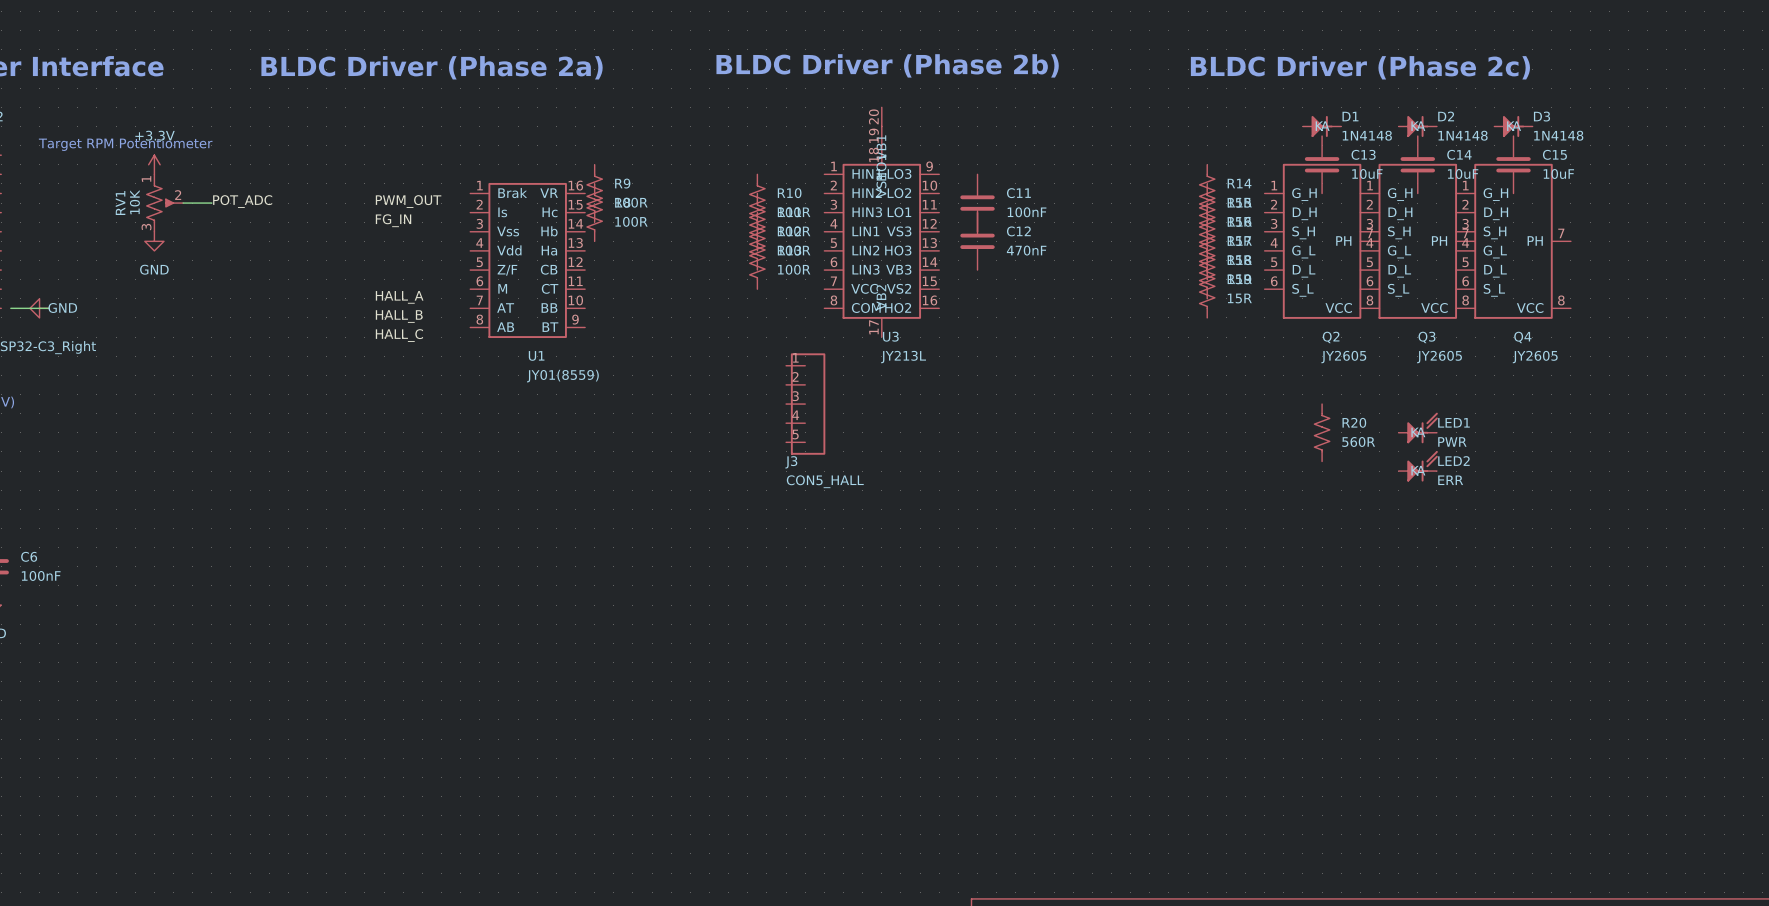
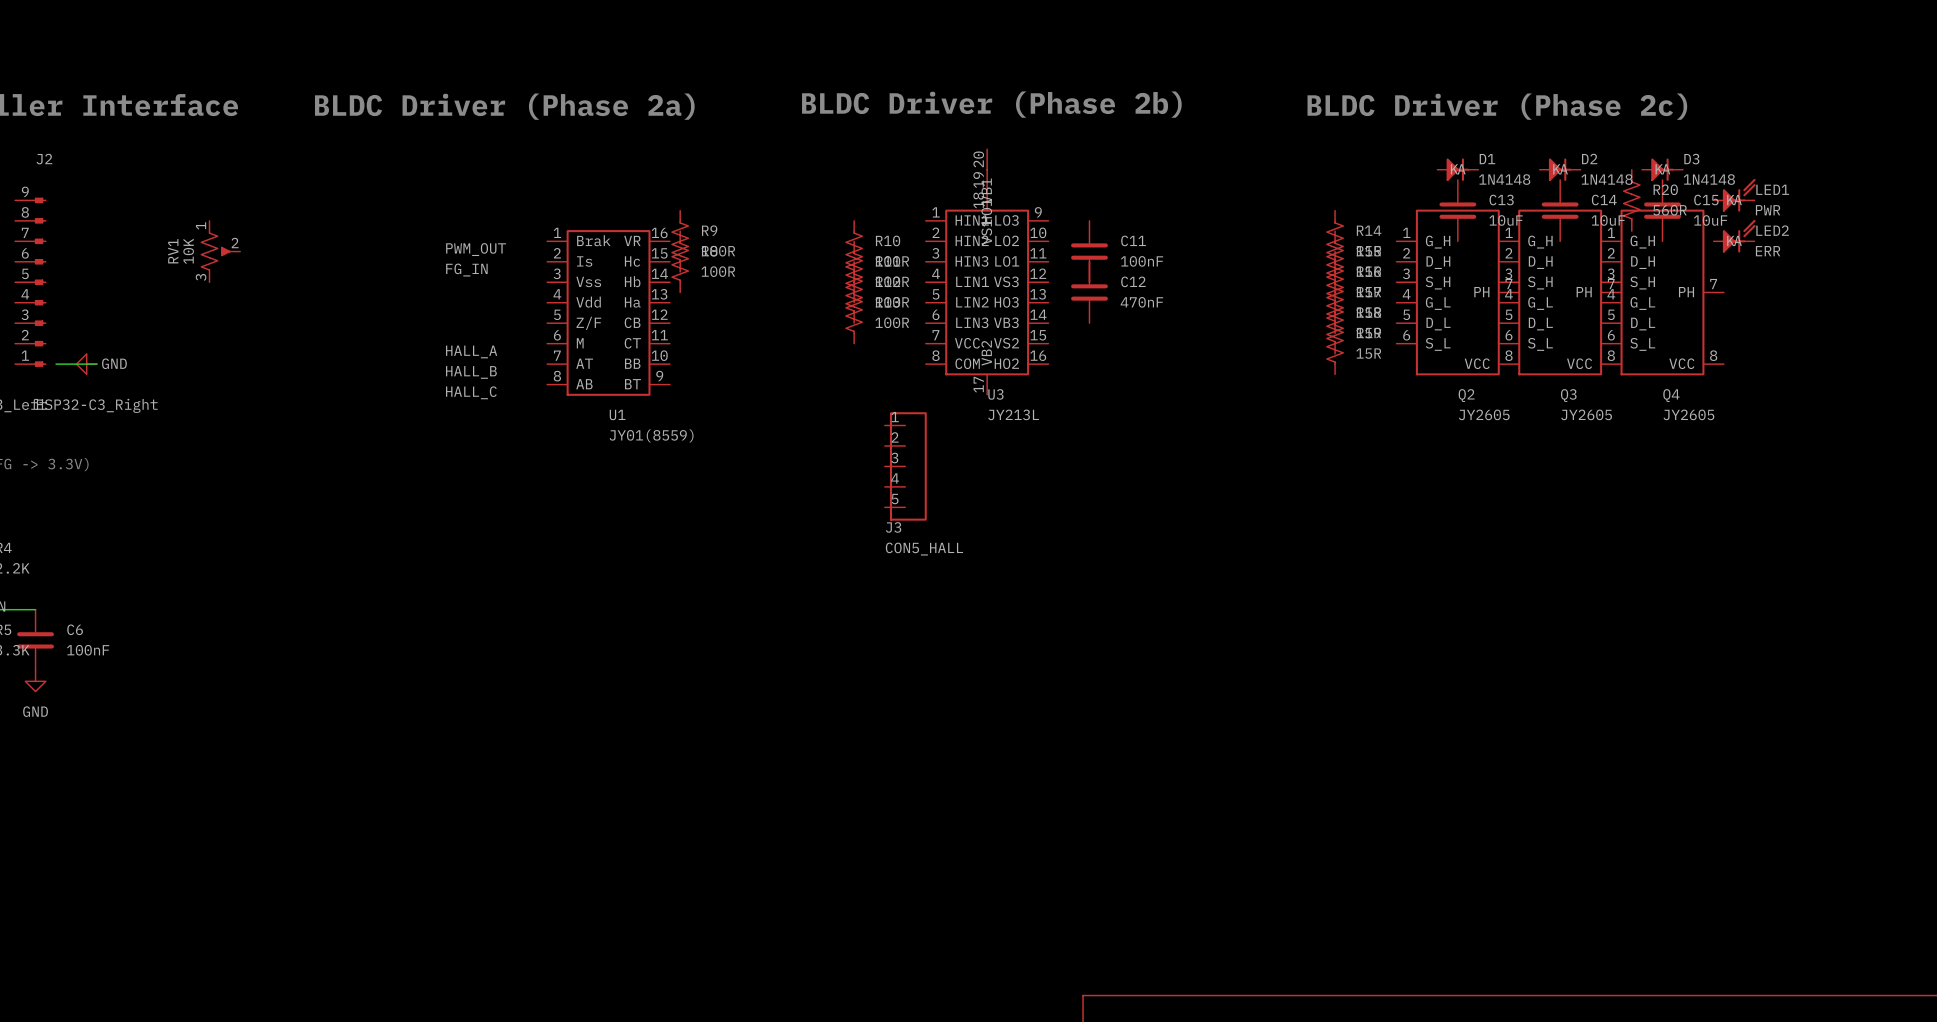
text: Target RPM Potentiometer (125, 144) -> none
power symbol: +3.3V (154, 164) -> none
label: POT_ADC (242, 201) -> none
wire: (183, 203) (211, 203) -> none
power symbol: GND (154, 241) -> none
LED1 position: (1418, 427) -> (1734, 195)
R20 position: (1322, 432) -> (1631, 200)
LED2 position: (1418, 466) -> (1734, 236)

